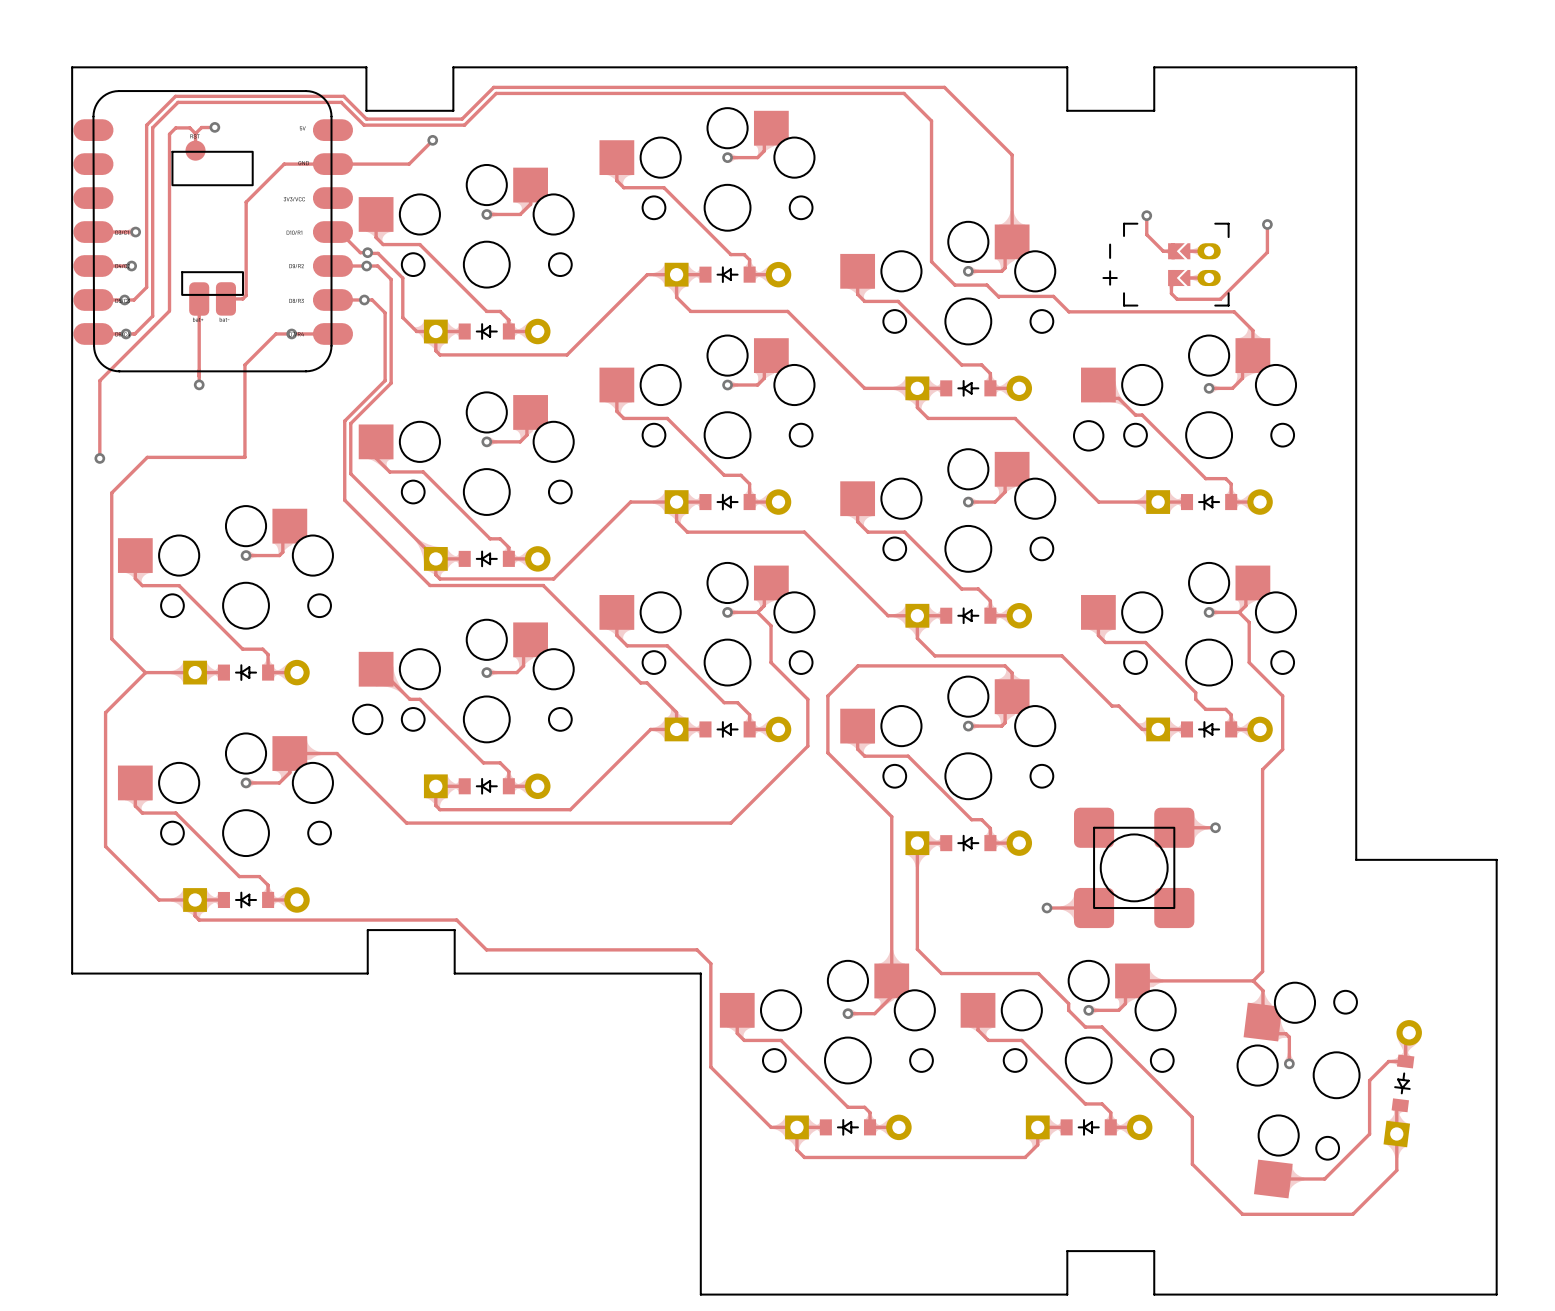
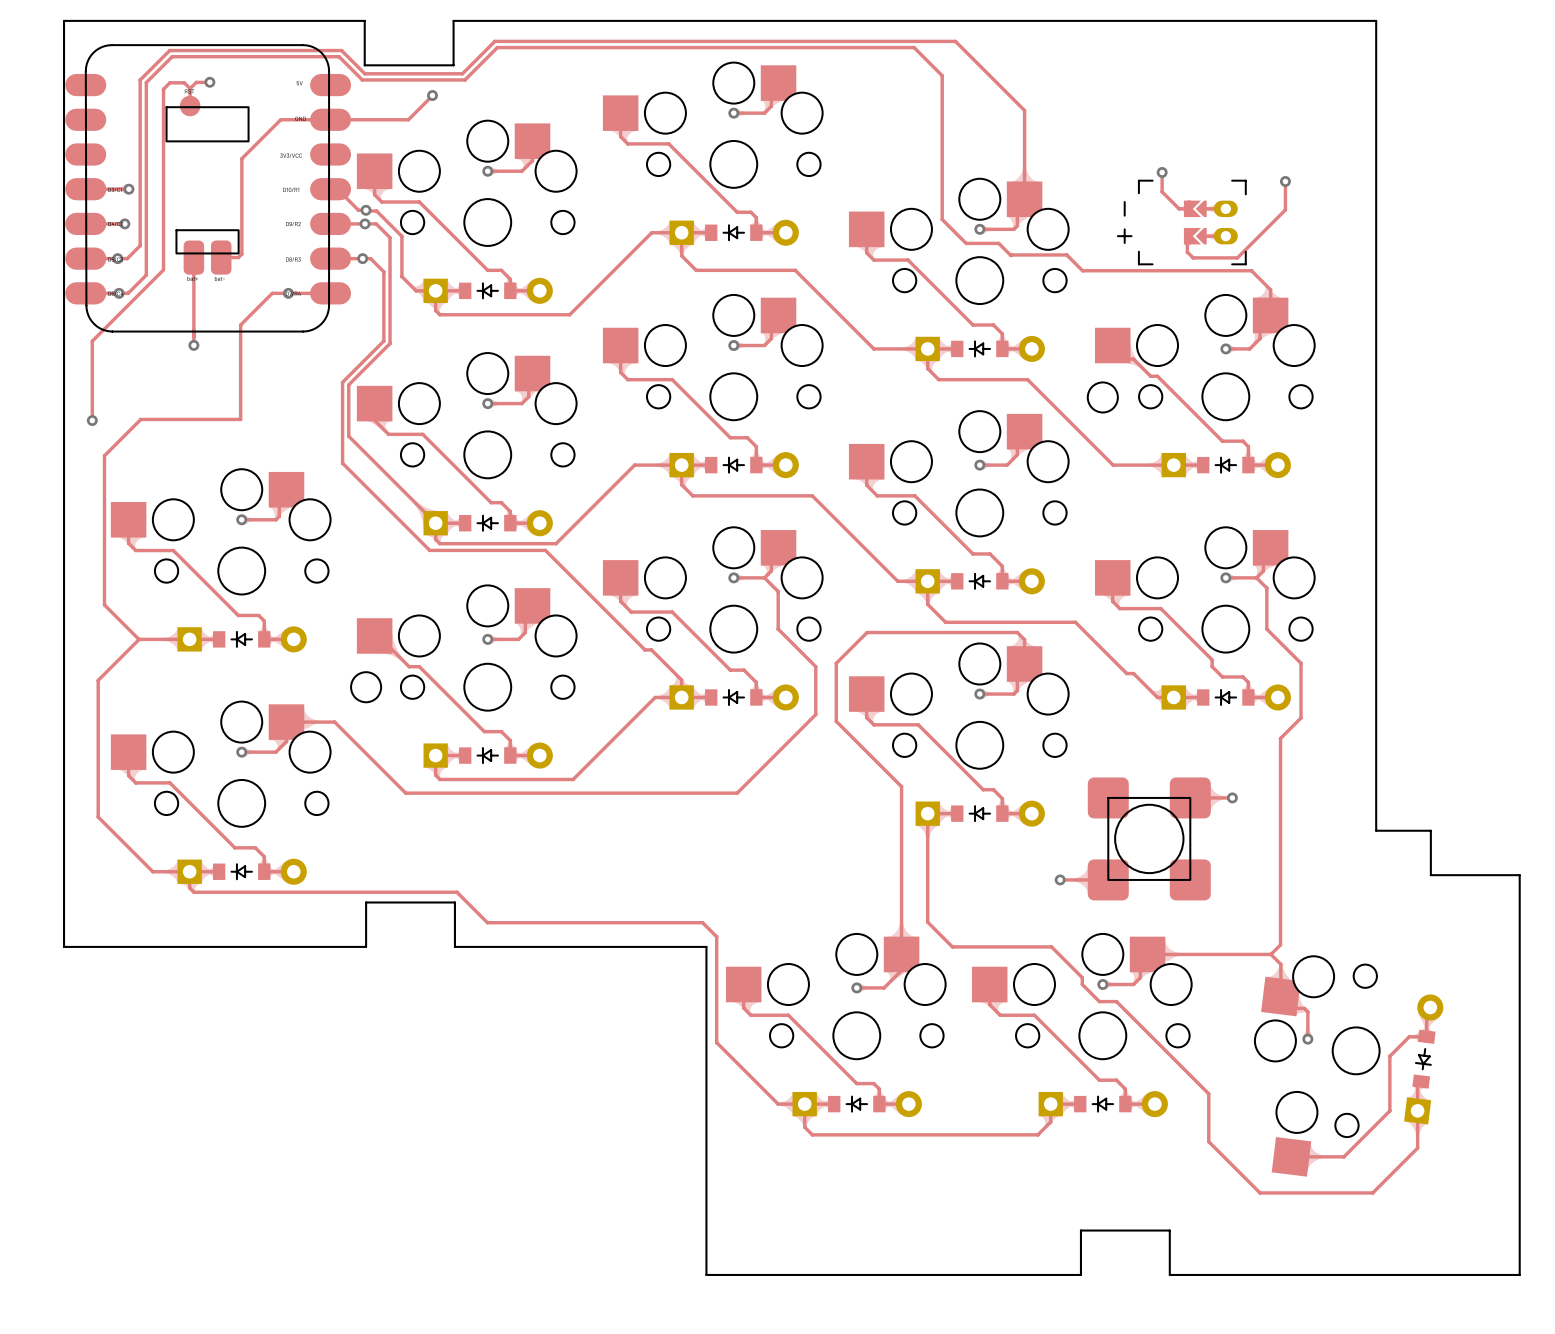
board edge: (1067, 67) (1067, 110) (1154, 110) (1154, 67) -> (1080, 20) (1169, 20)
board edge: (1409, 859) (1496, 859) (1496, 903) -> (1430, 830) (1430, 875) (1519, 875)

